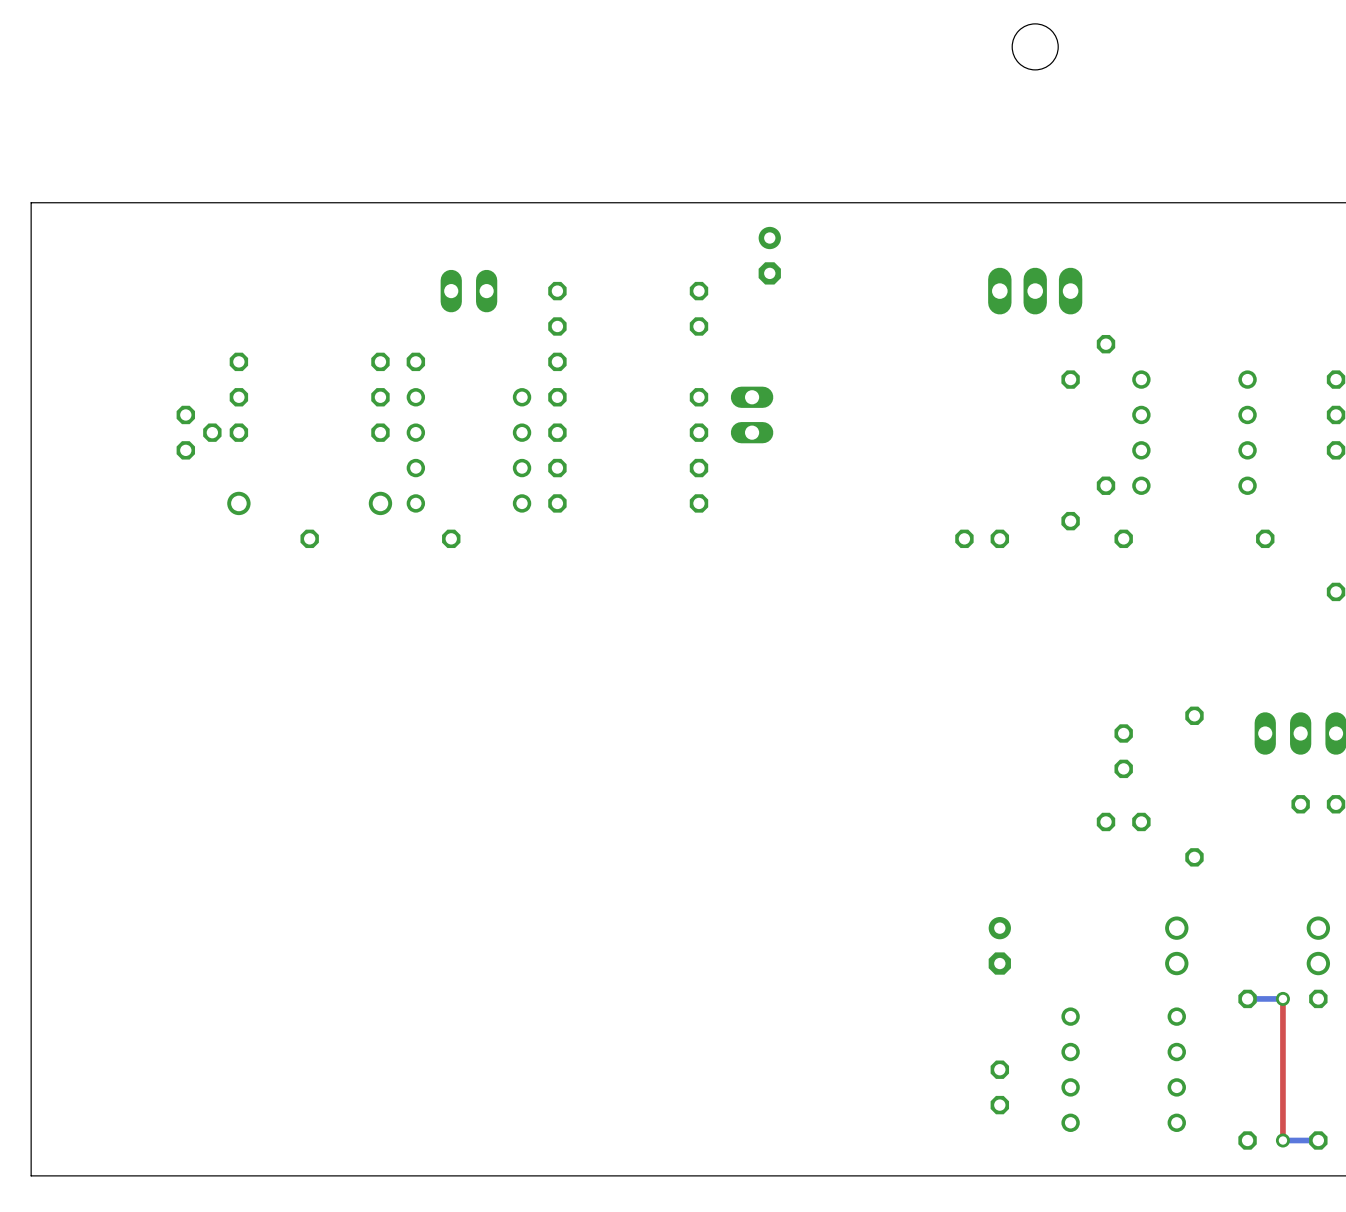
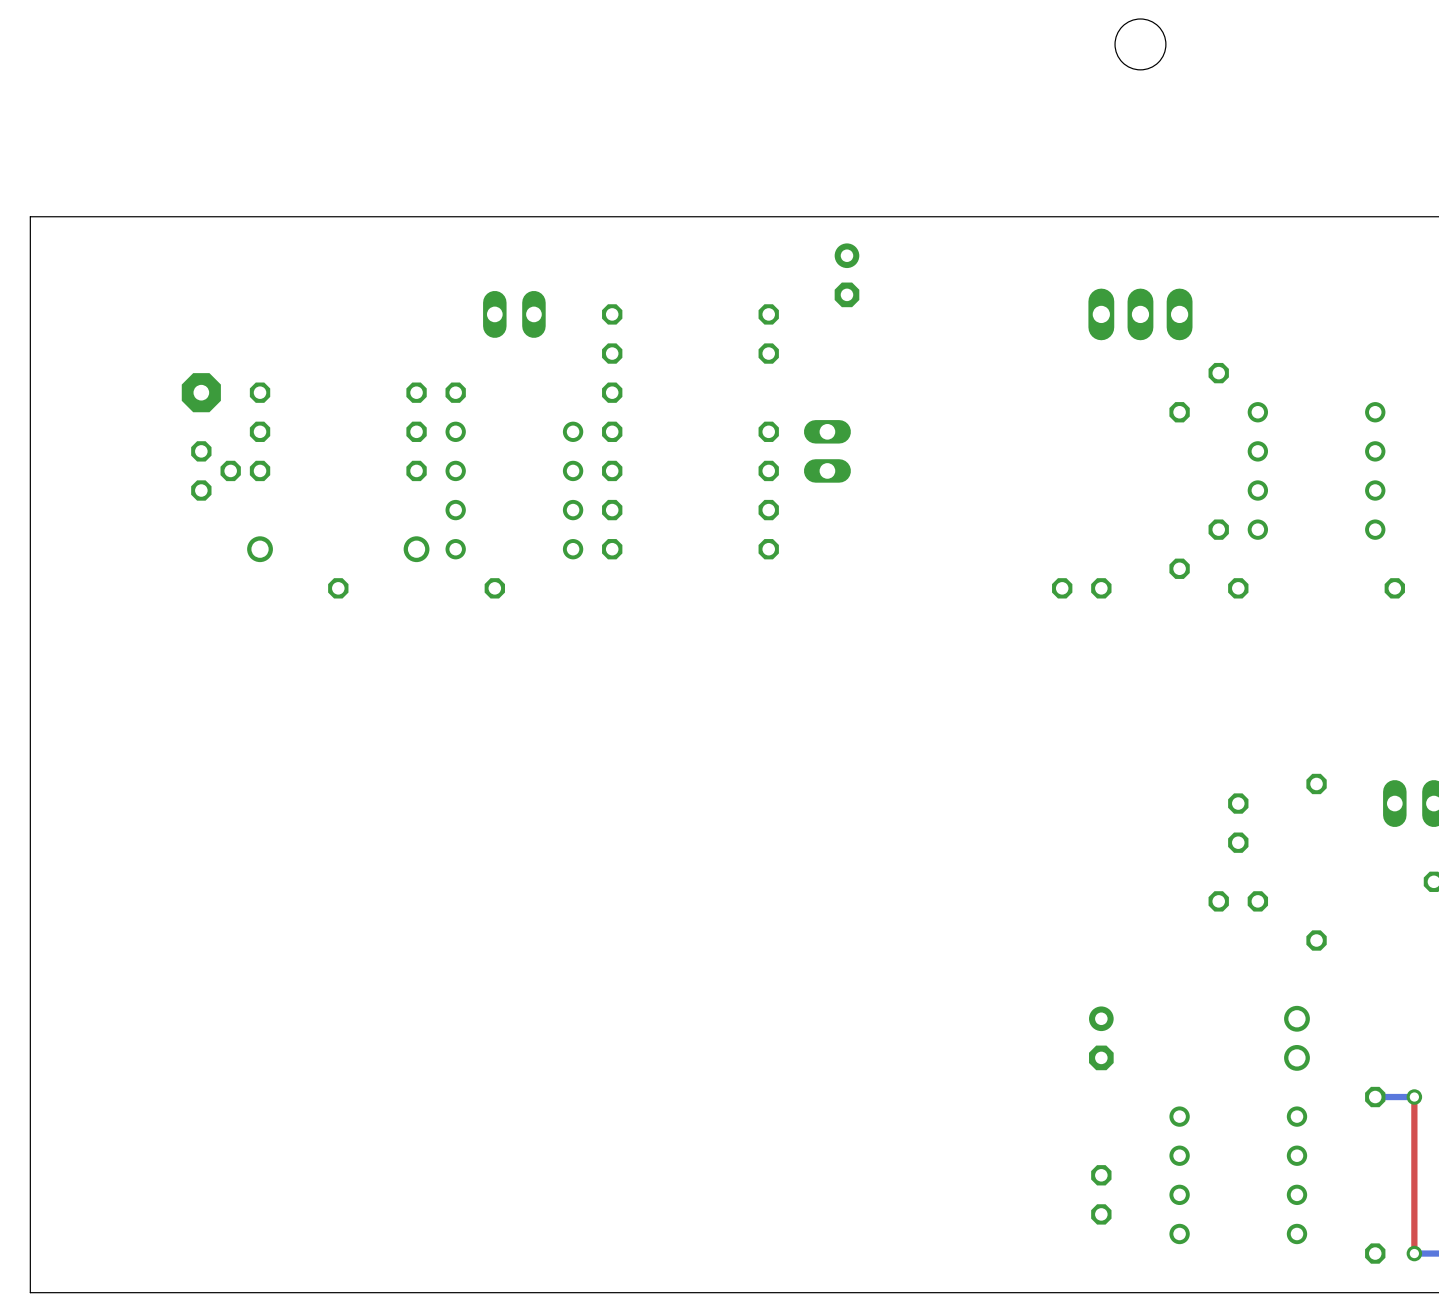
part: none -> (201, 392)

